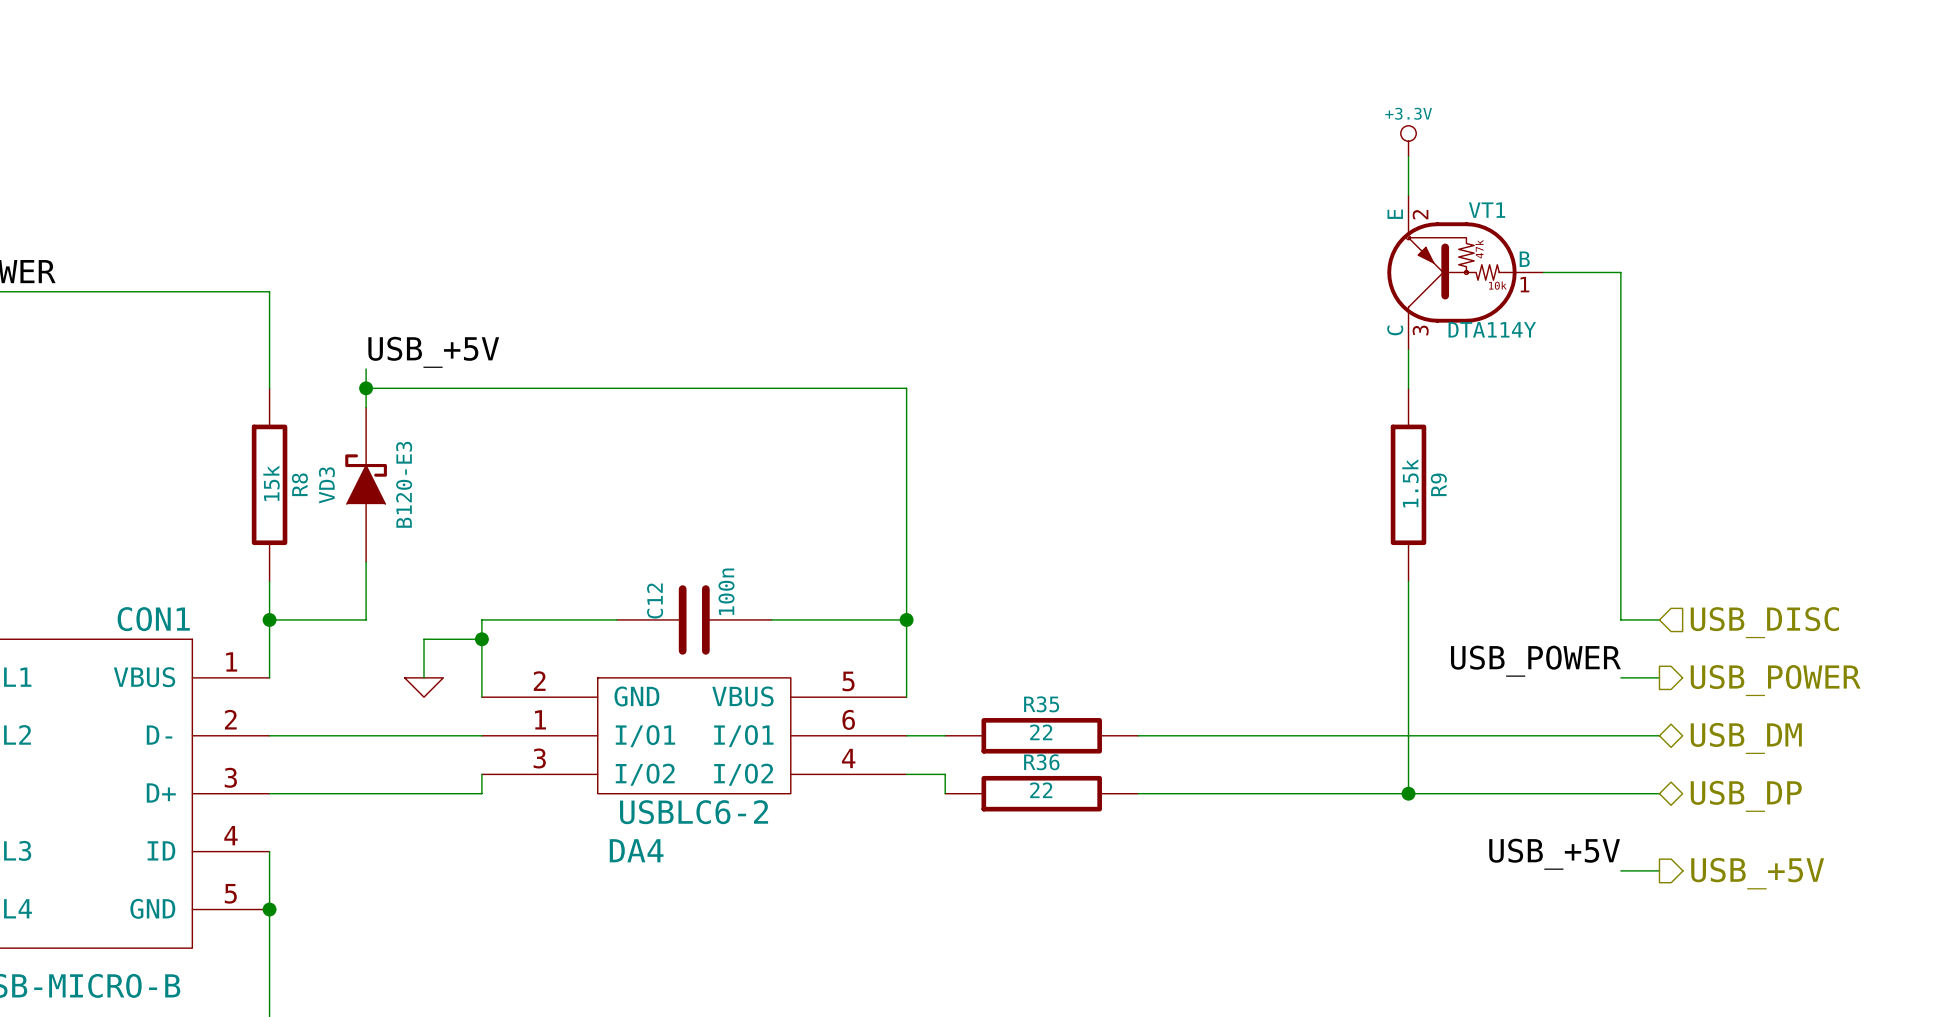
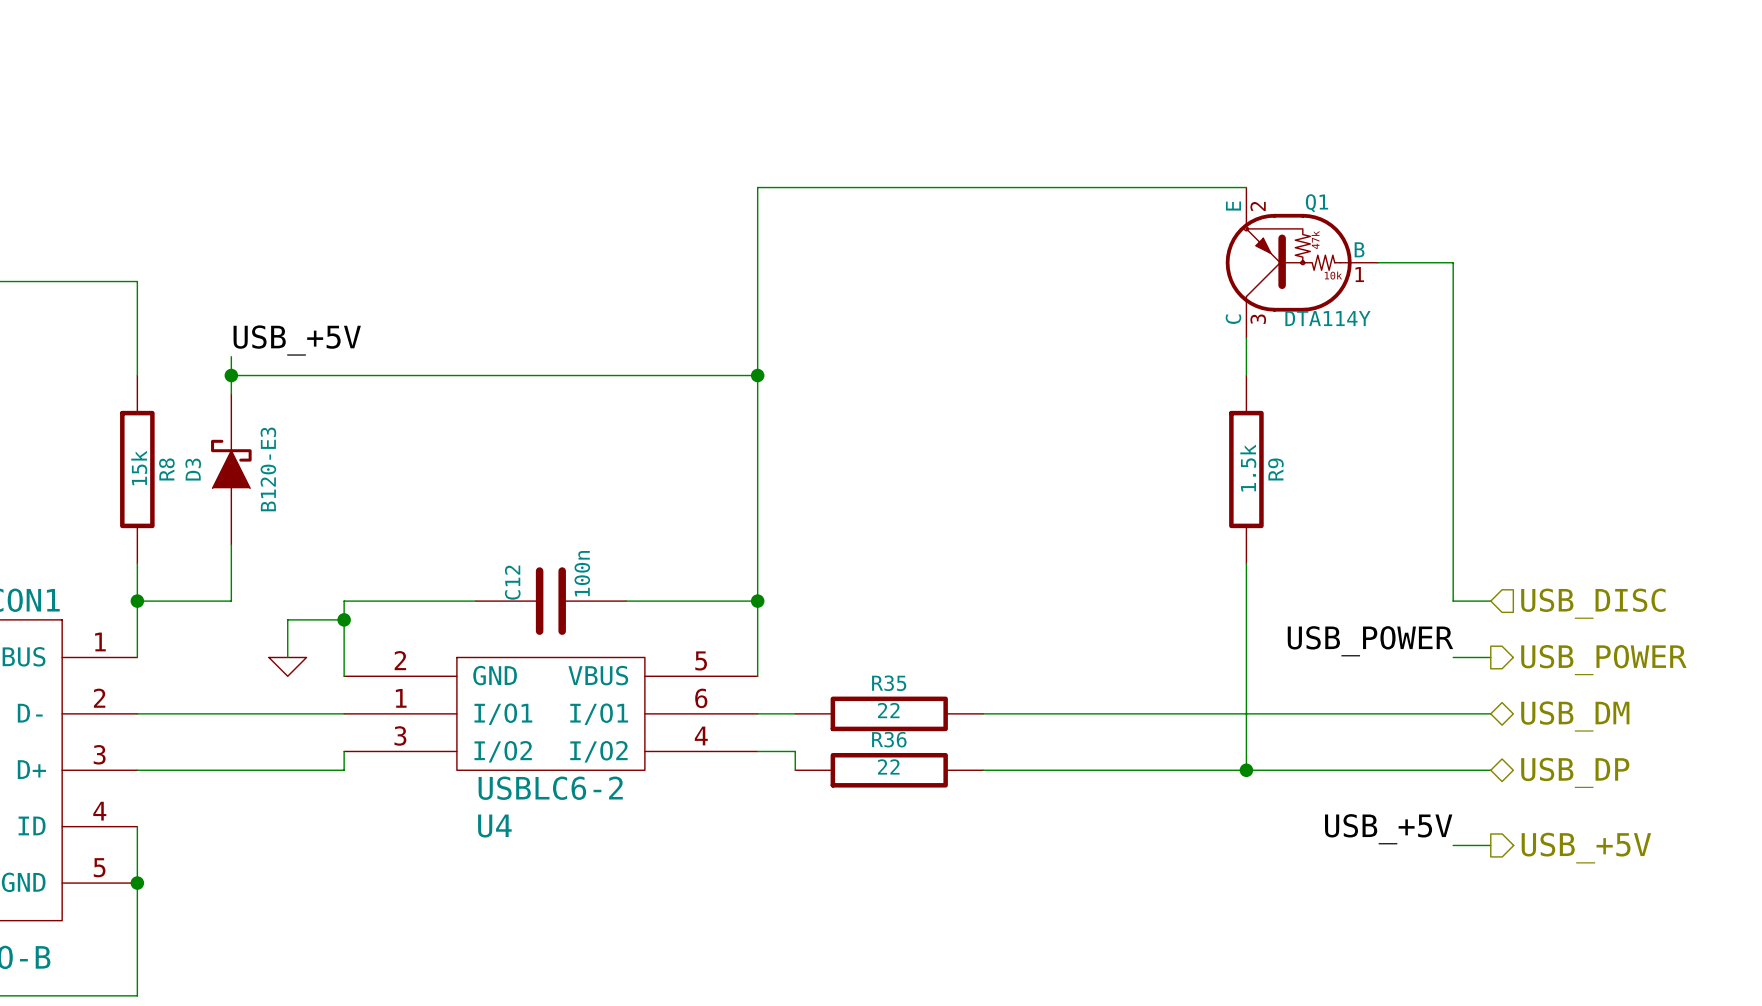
power symbol: +3.3V (1408, 141) -> none
wire: (1408, 156) (1408, 195) -> (757, 375) (757, 187) (1246, 187)
VT1 name: VT1 (1487, 210) -> Q1 (1316, 203)
junction: none -> (757, 375)
VD3 name: VD3 (326, 485) -> D3 (193, 469)
DA4 name: DA4 (636, 850) -> U4 (494, 826)

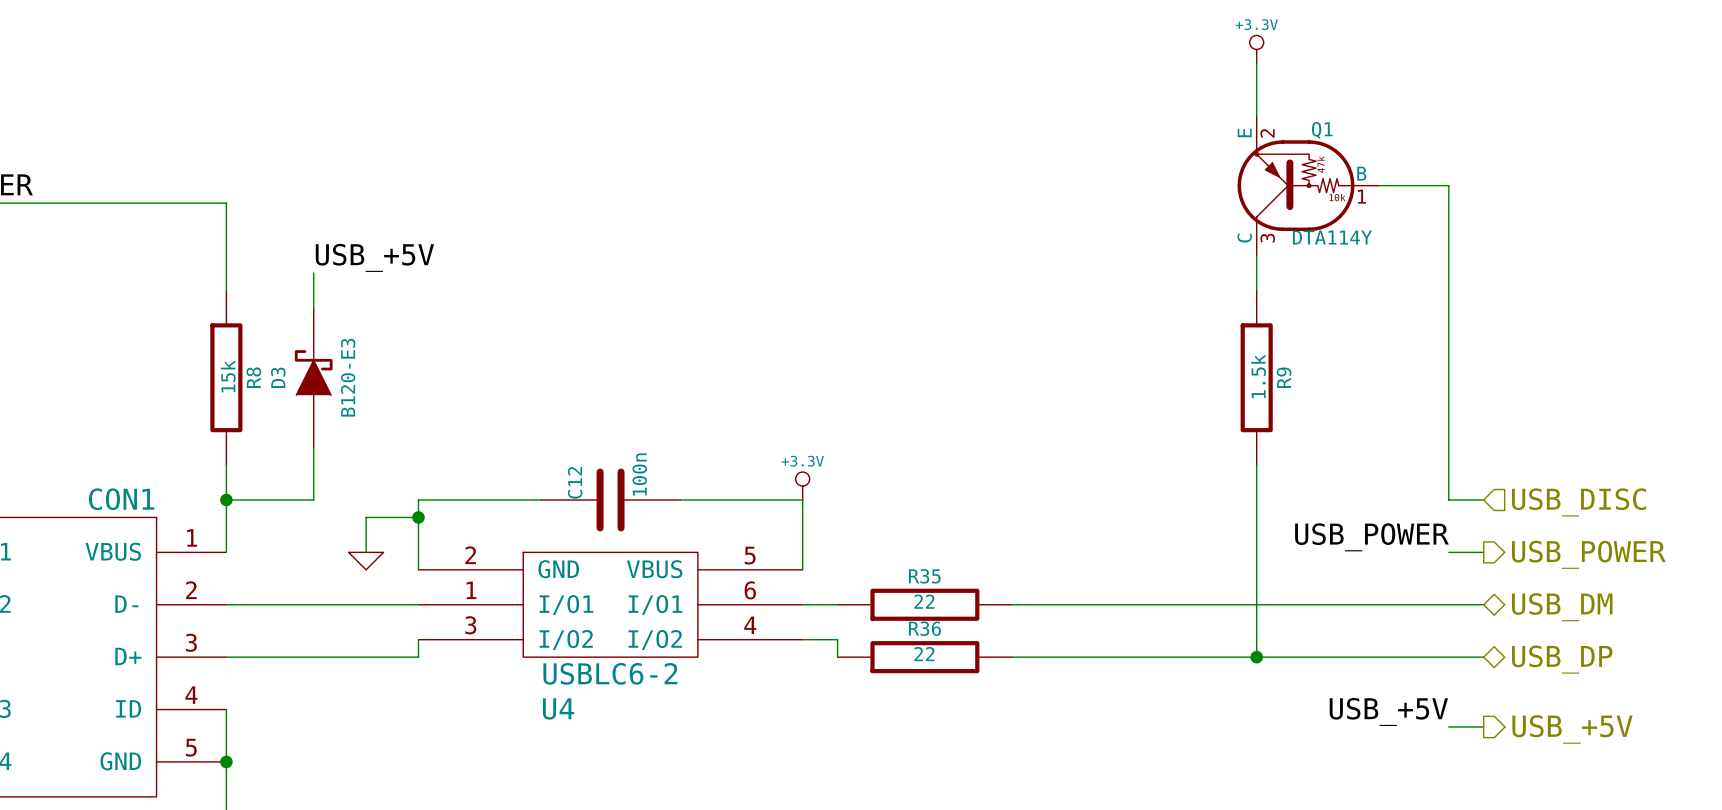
power symbol: none -> +3.3V (1256, 49)
wire: (1246, 187) (757, 187) (757, 601) -> (1256, 115) (1256, 63)
wire: (231, 375) (757, 375) -> none
junction: (231, 375) -> none
junction: (757, 375) -> none
power symbol: none -> +3.3V (802, 486)
junction: (757, 601) -> none

